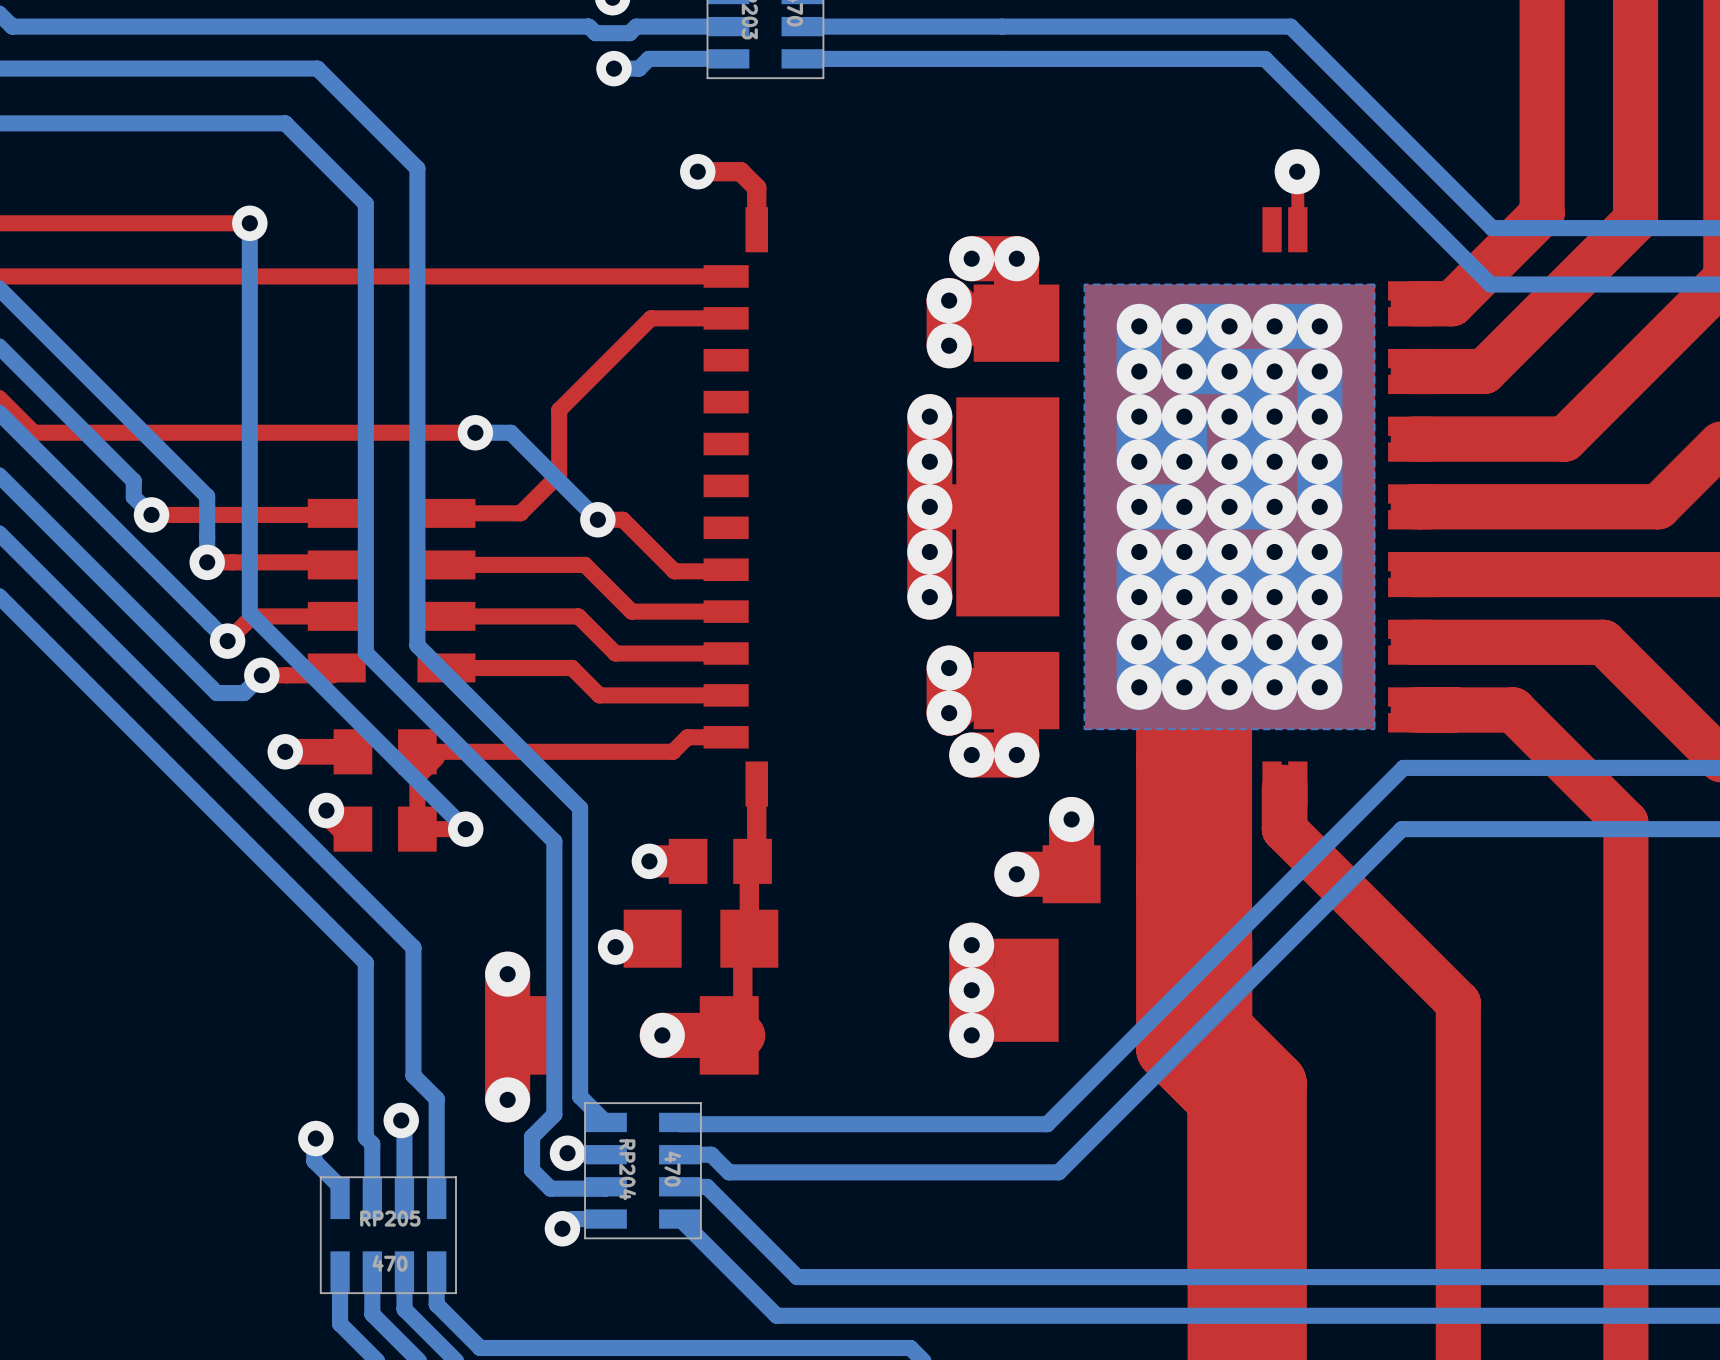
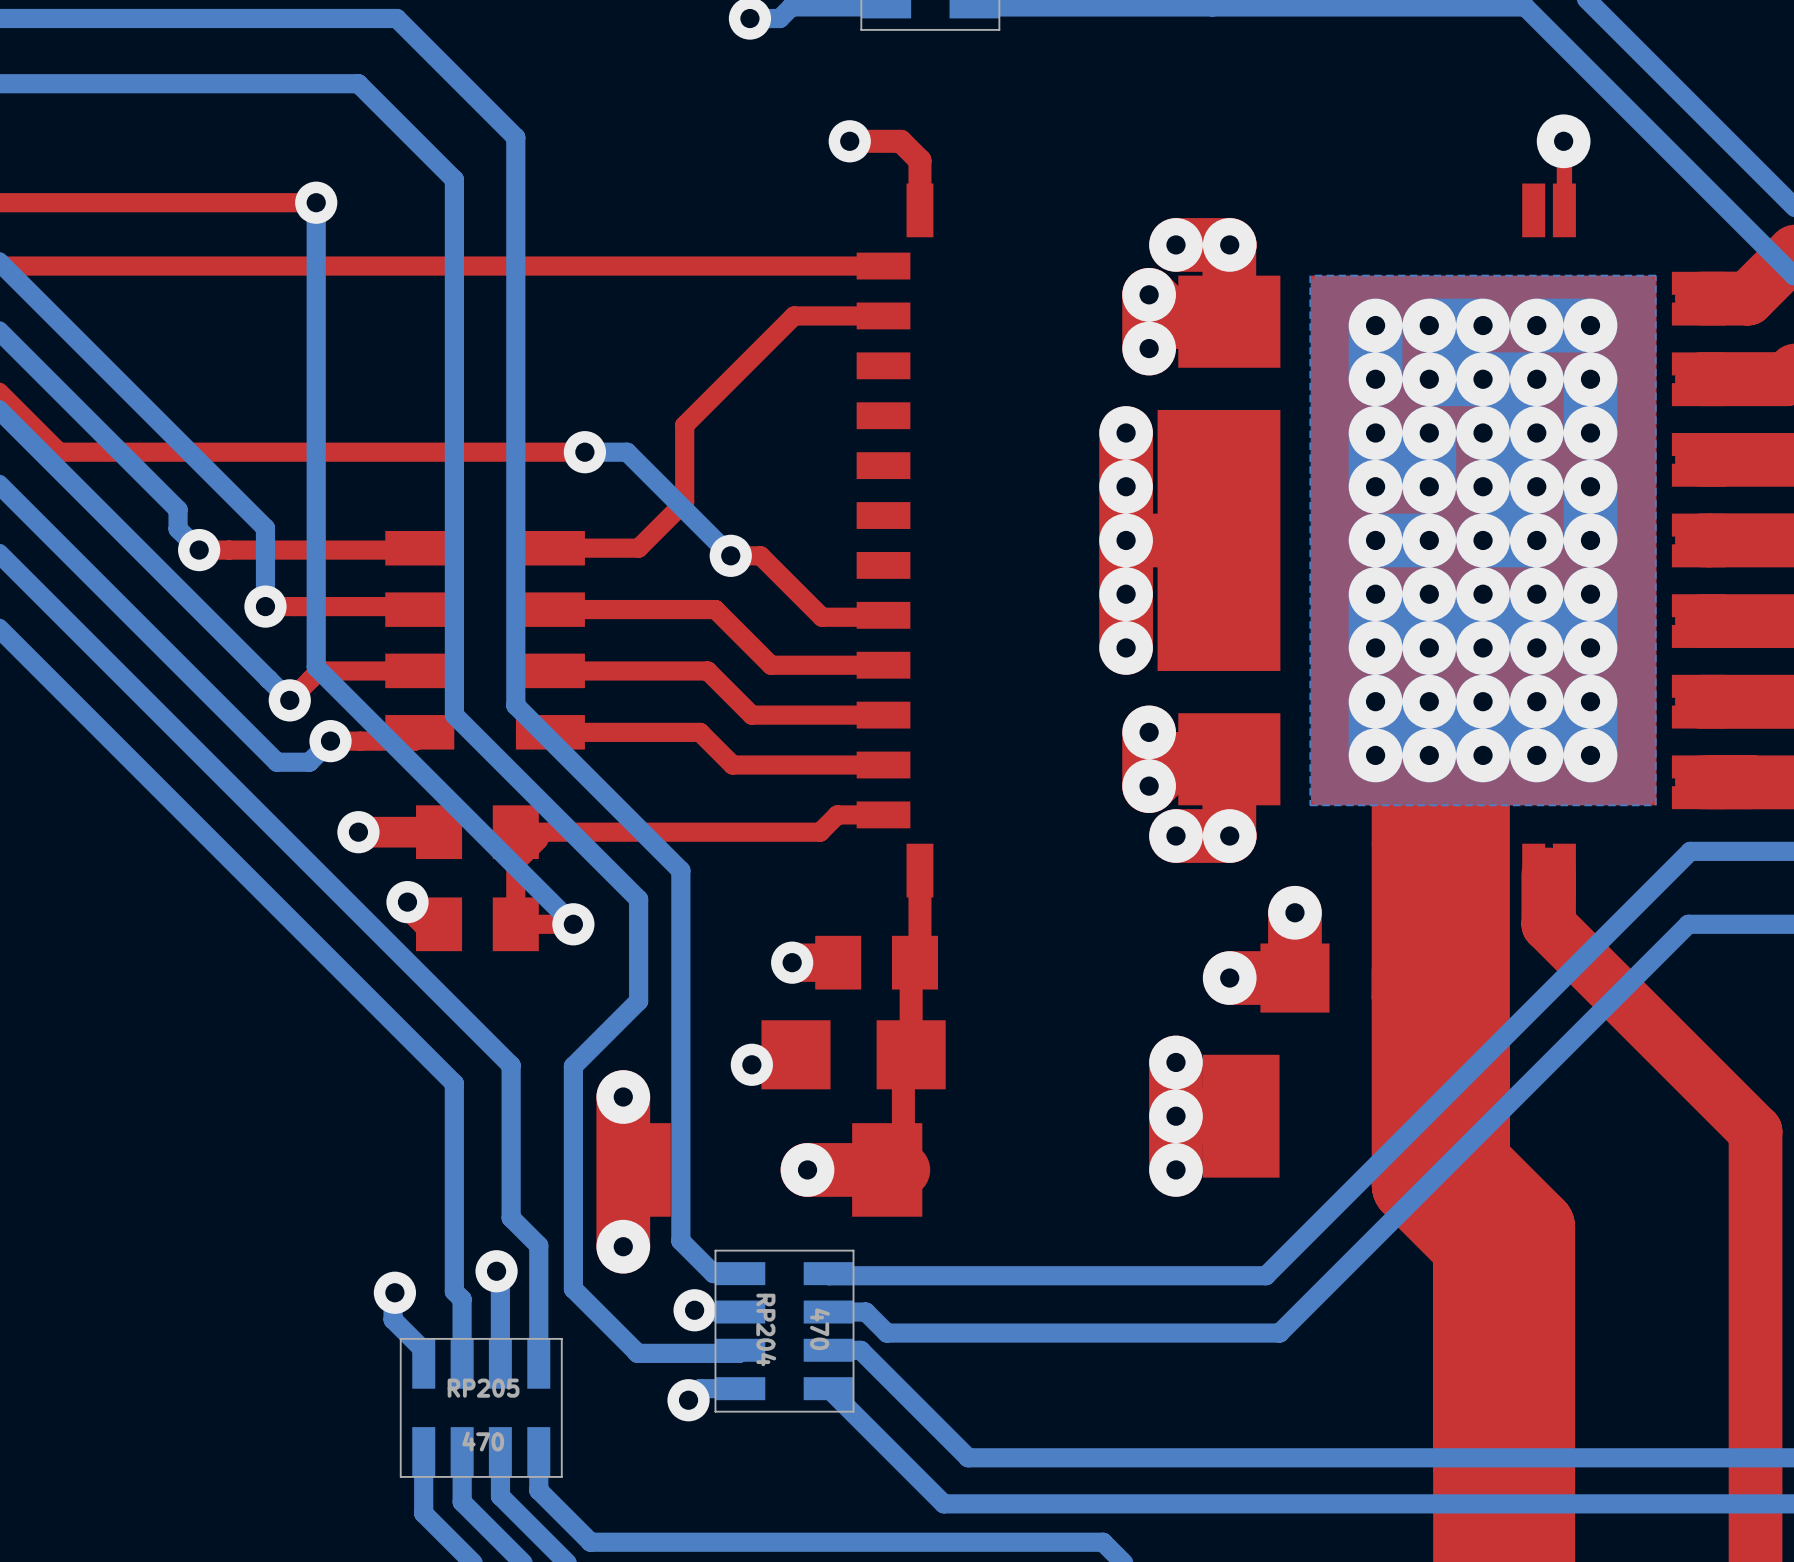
bottom track: (365, 652) (554, 841) (554, 1114) (532, 1136) (532, 1170) (550, 1188) (605, 1188) -> (454, 715) (638, 899) (638, 1001) (573, 1066) (573, 1288) (637, 1353) (739, 1353)
bottom track: (555, 784) (580, 808) (580, 1096) (605, 1122) -> (680, 870) (680, 1240) (713, 1273) (740, 1273)

